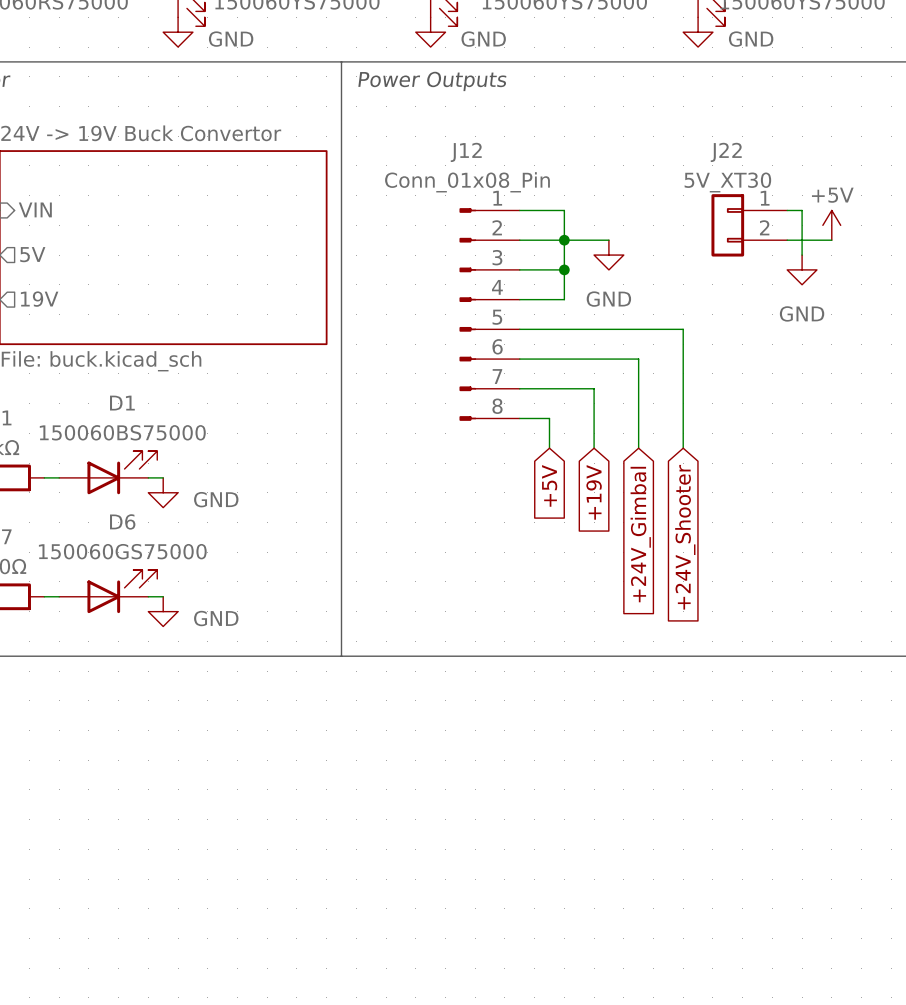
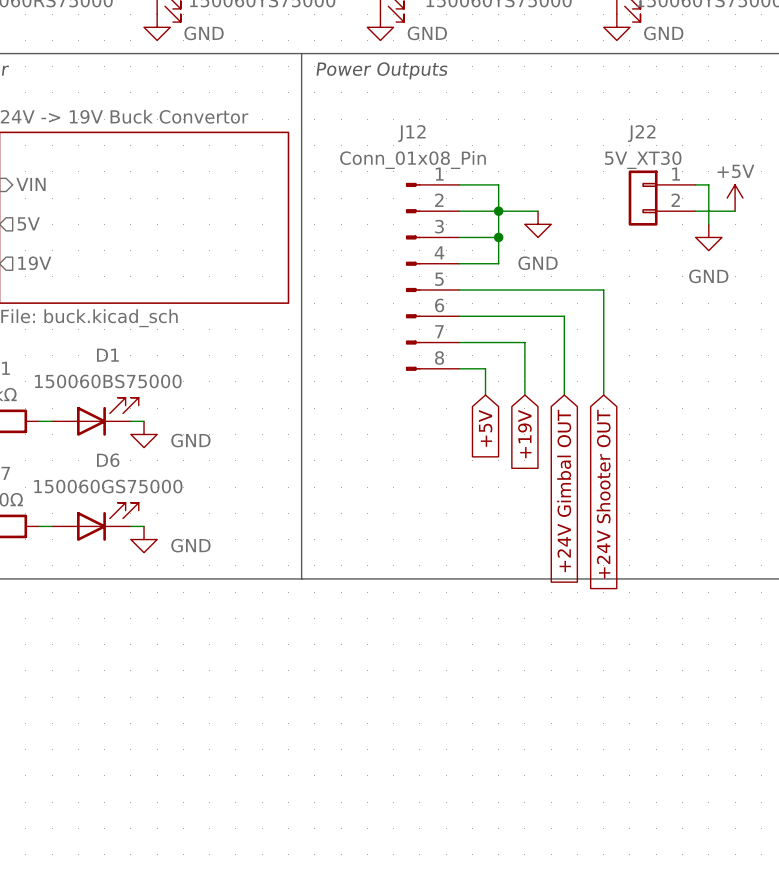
global label: +24V_Gimbal (640, 534) -> +24V Gimbal OUT (564, 490)
global label: +24V_Shooter (685, 537) -> +24V Shooter OUT (603, 494)

